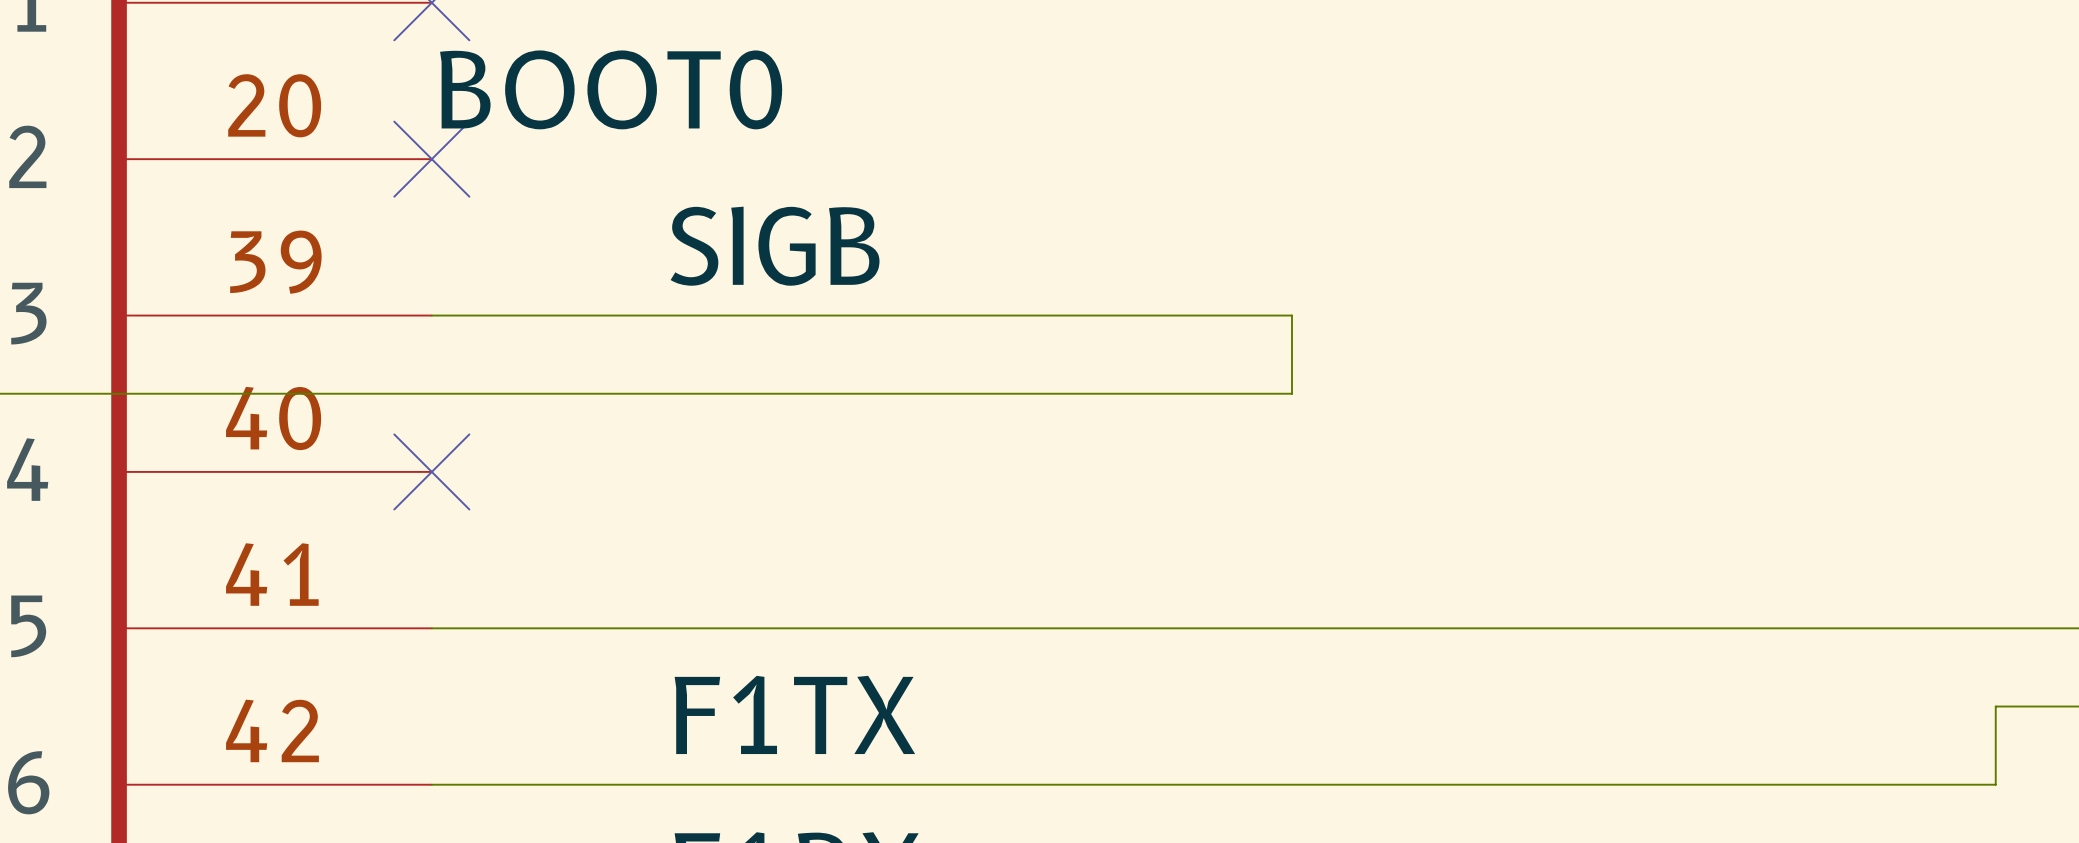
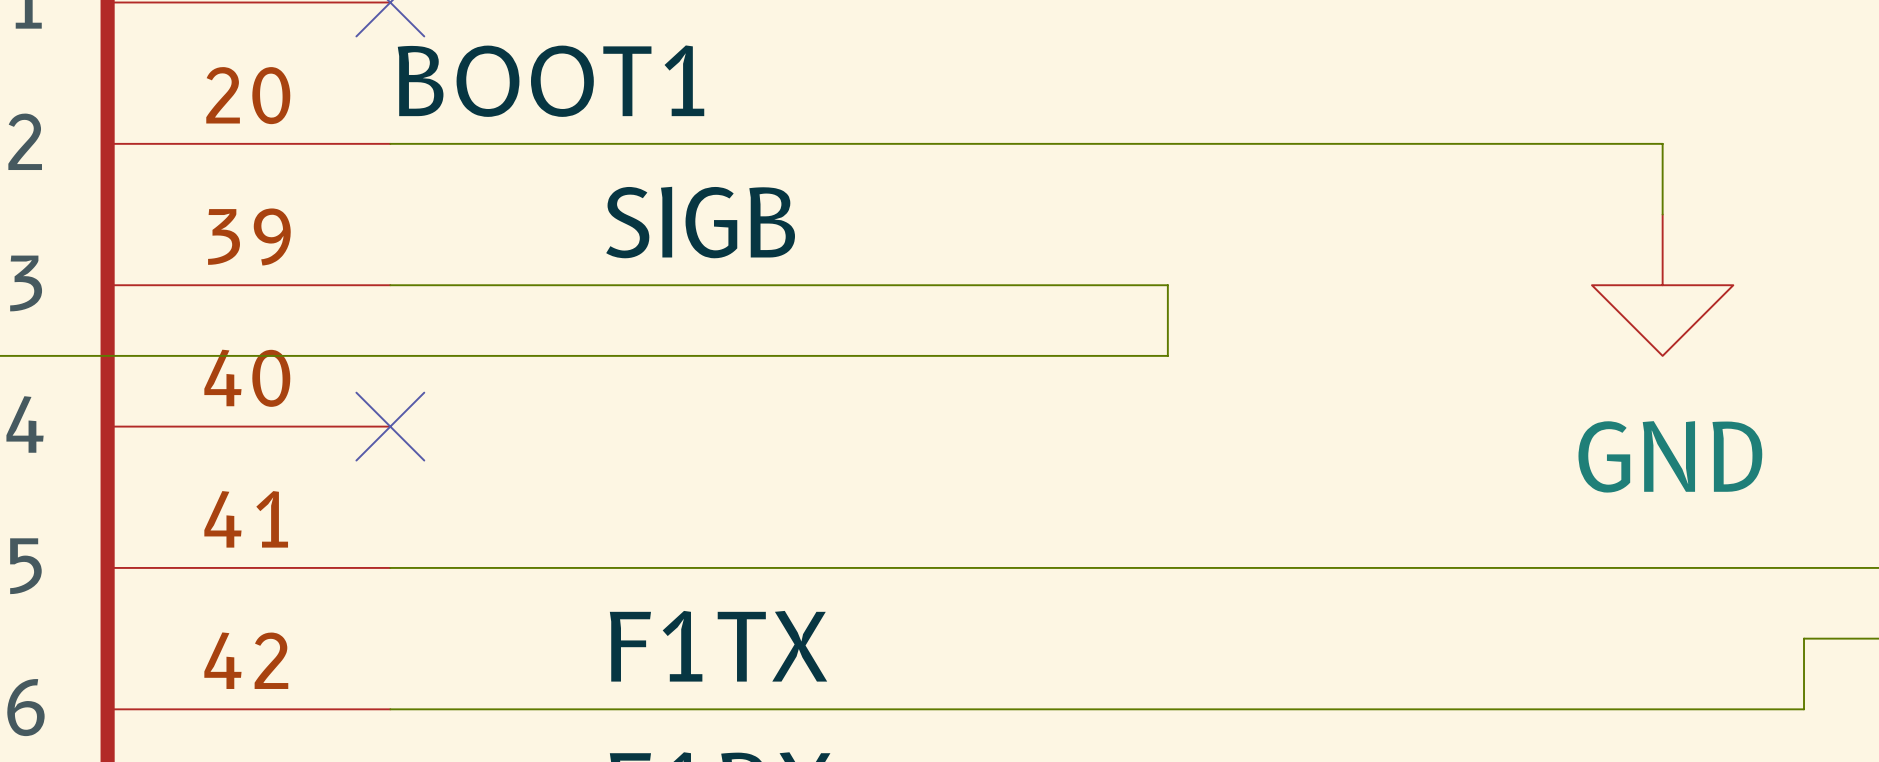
label: BOOT0 (611, 89) -> BOOT1 (551, 81)
wire: none -> (390, 143) (1662, 143) (1662, 214)
no-connect mark: (431, 159) -> none
power symbol: none -> GND (1662, 285)

